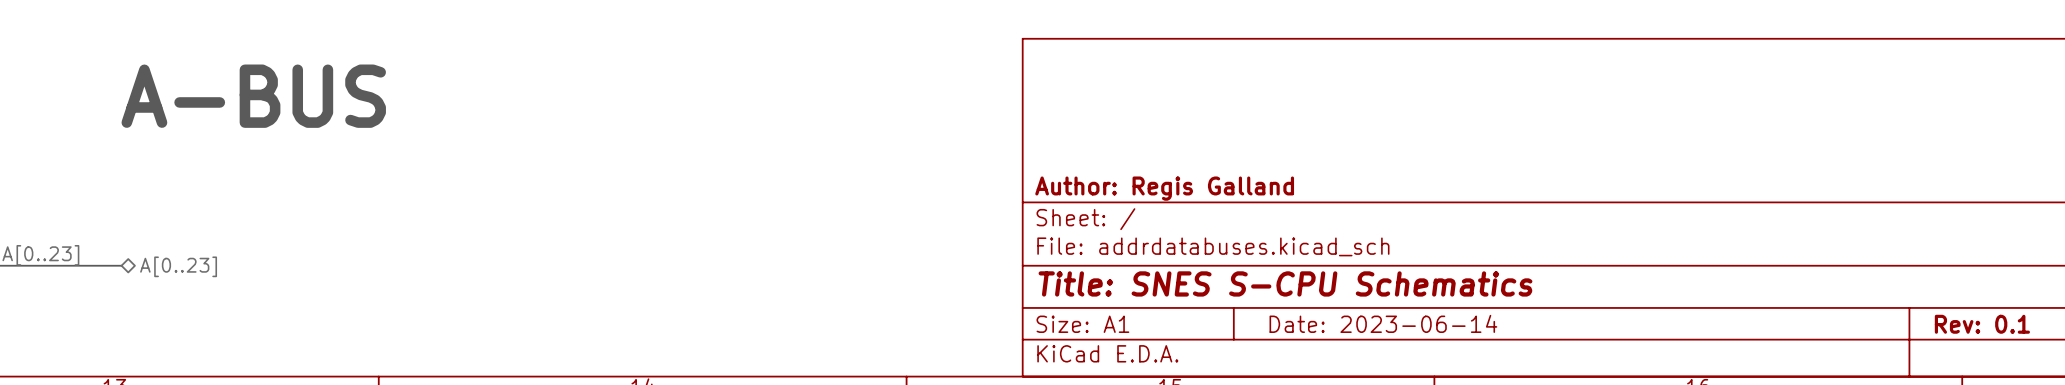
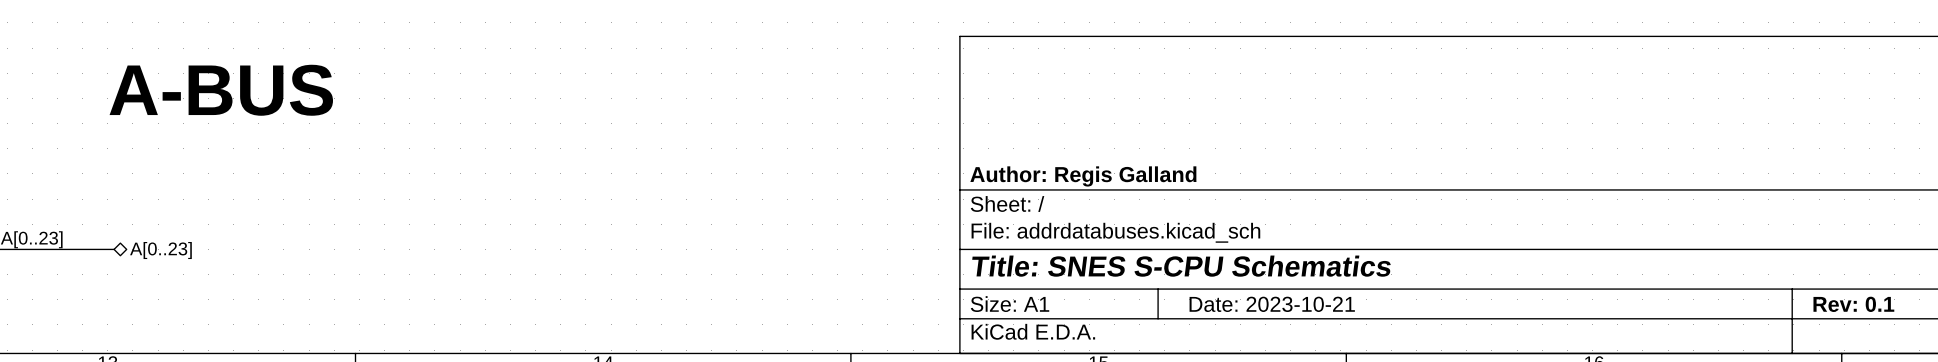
title block: Date: 2023-06-14 (1383, 323) -> Date: 2023-10-21 (1272, 304)

